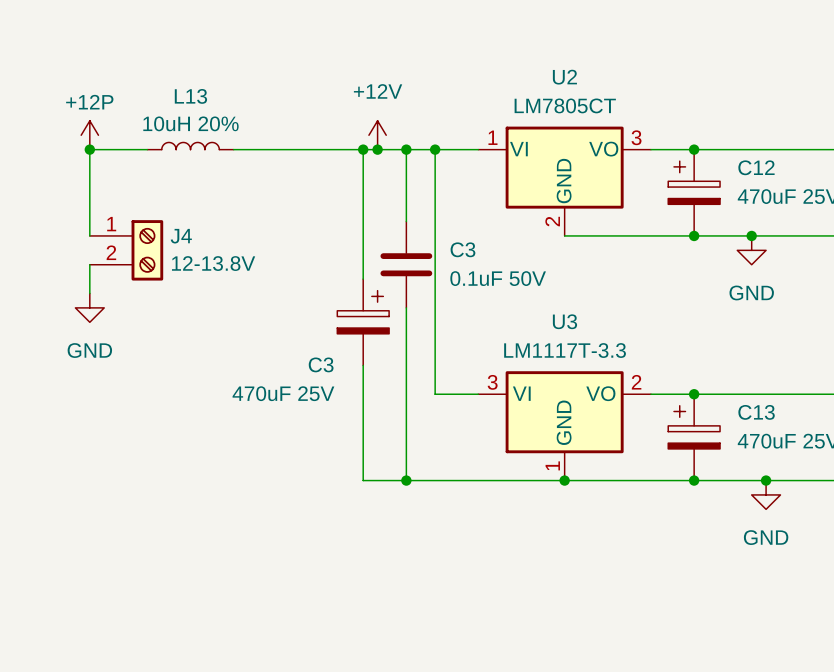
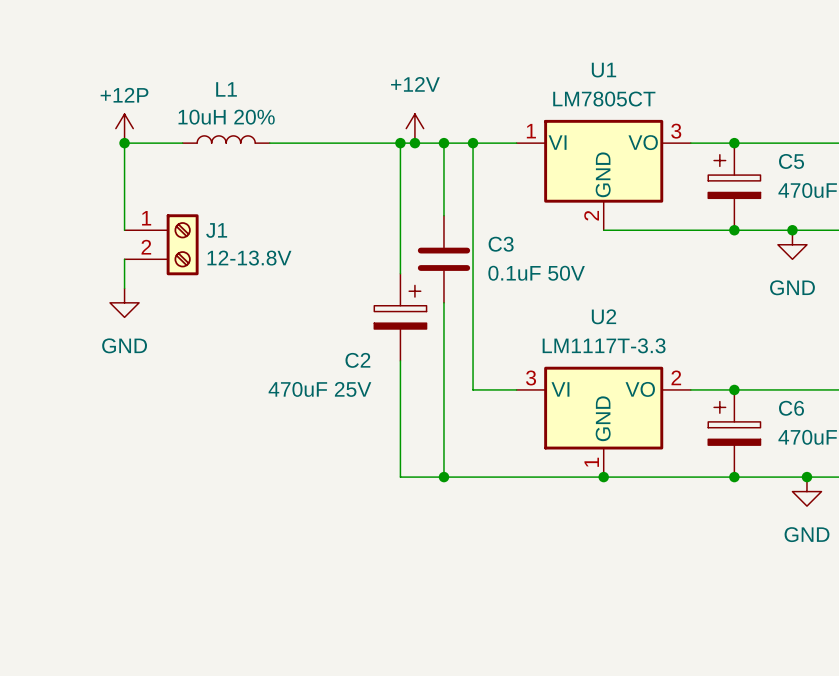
U2 name: U2 (564, 77) -> U1 (604, 70)
L13 name: L13 (190, 96) -> L1 (226, 89)
C12 name: C12 (756, 167) -> C5 (791, 161)
J4 name: J4 (181, 236) -> J1 (216, 230)
U3 name: U3 (564, 321) -> U2 (603, 316)
C3 name: C3 (321, 364) -> C2 (357, 360)
C13 name: C13 (756, 412) -> C6 (791, 408)

